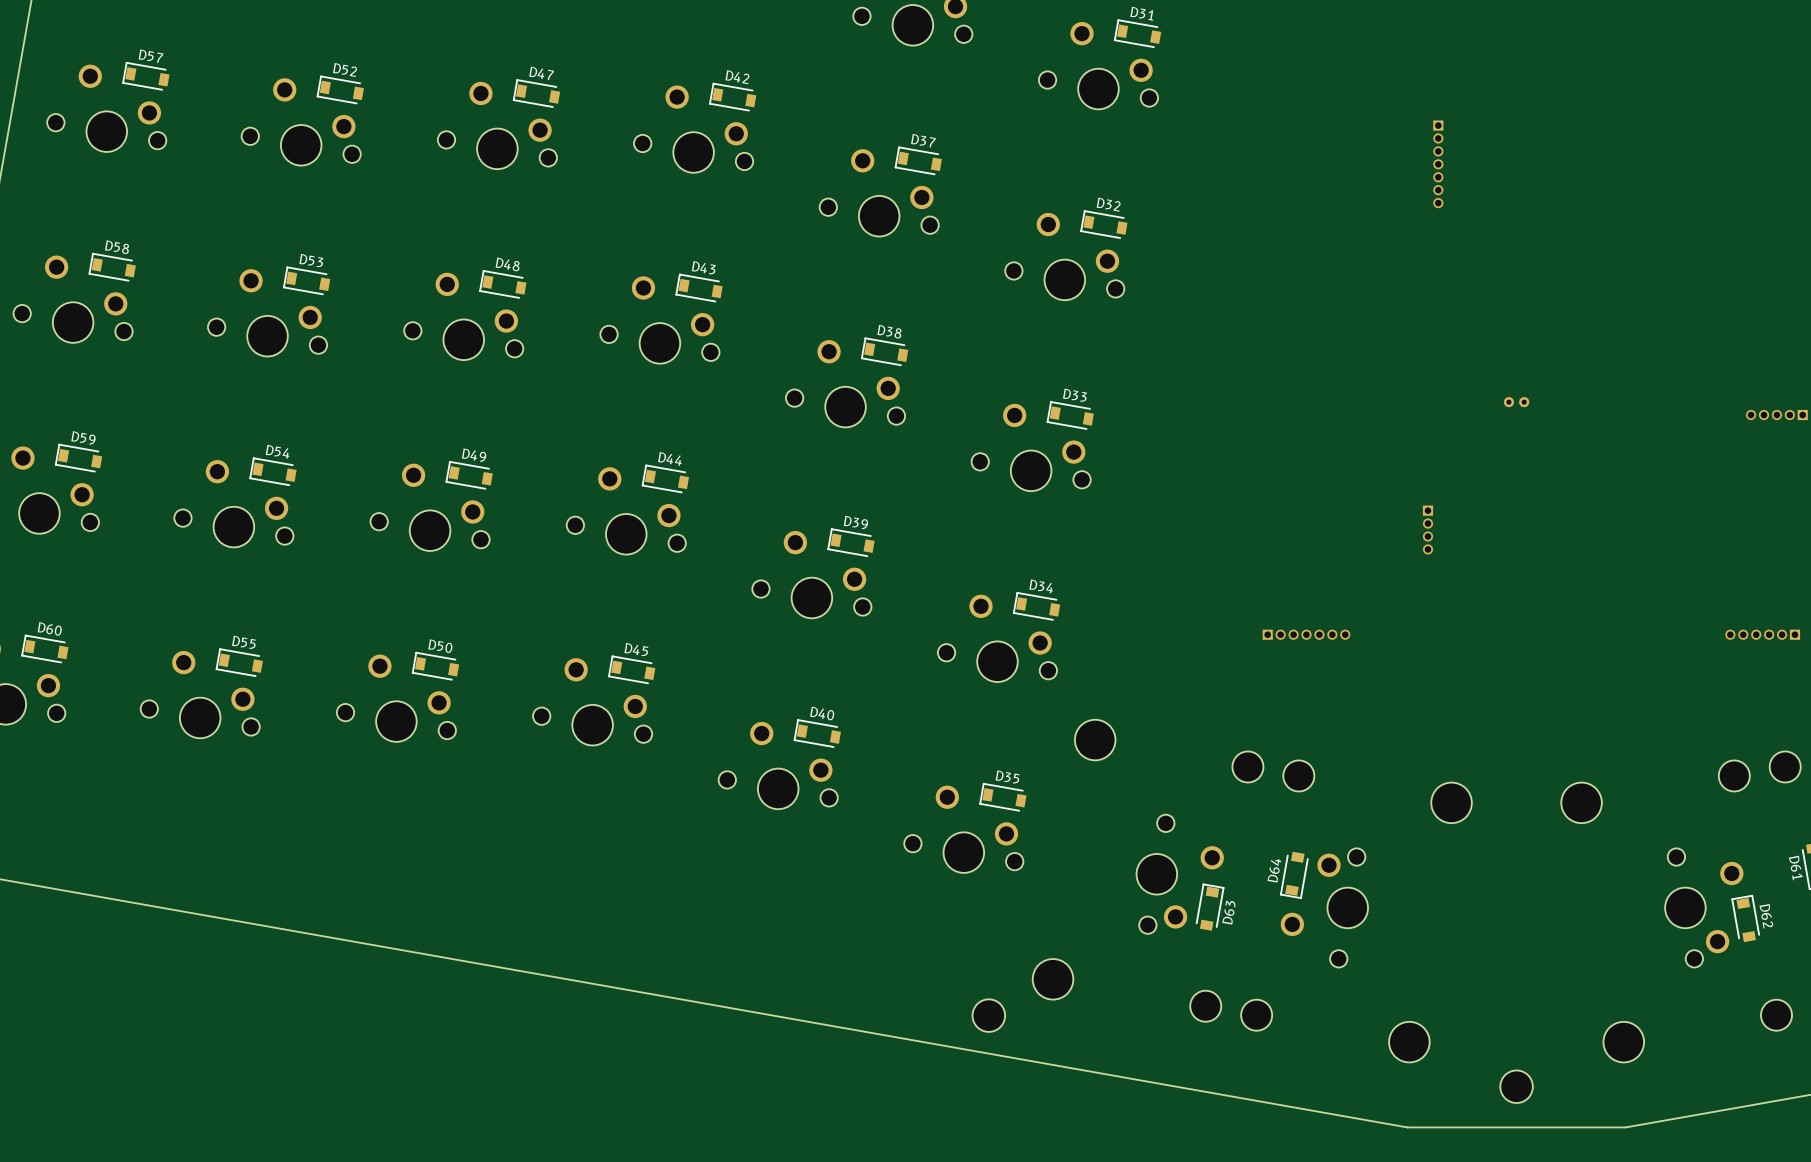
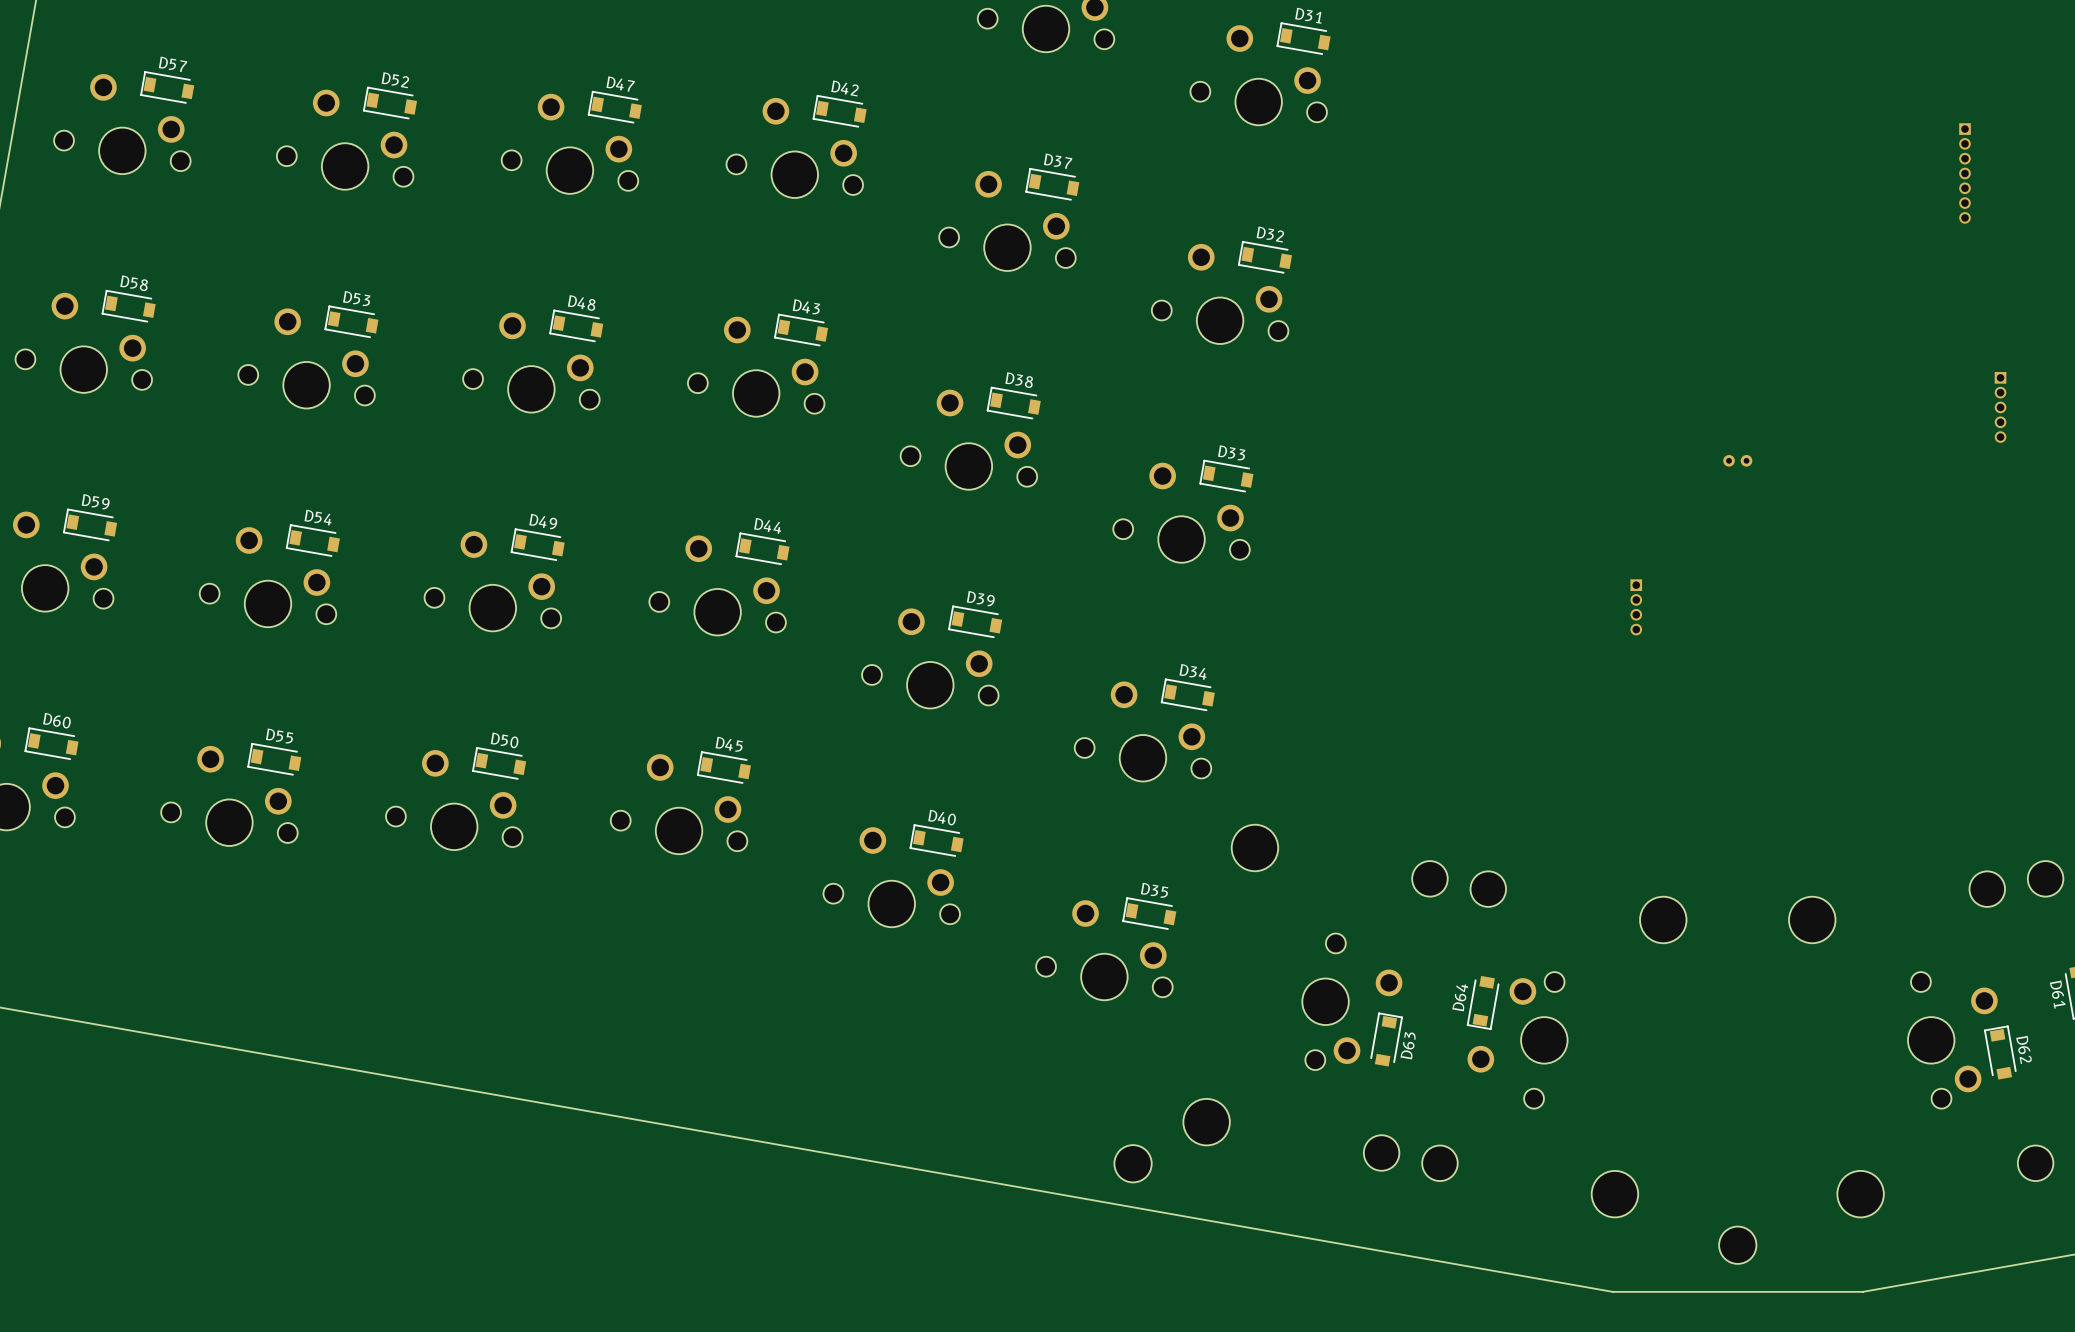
part: none -> (1965, 173)
part: (1438, 164) -> none
part rotation: 0° (1776, 415) -> 90° counterclockwise (2000, 407)
part position: (1776, 415) -> (2000, 407)
part: (1306, 634) -> none
part: (1762, 634) -> none

